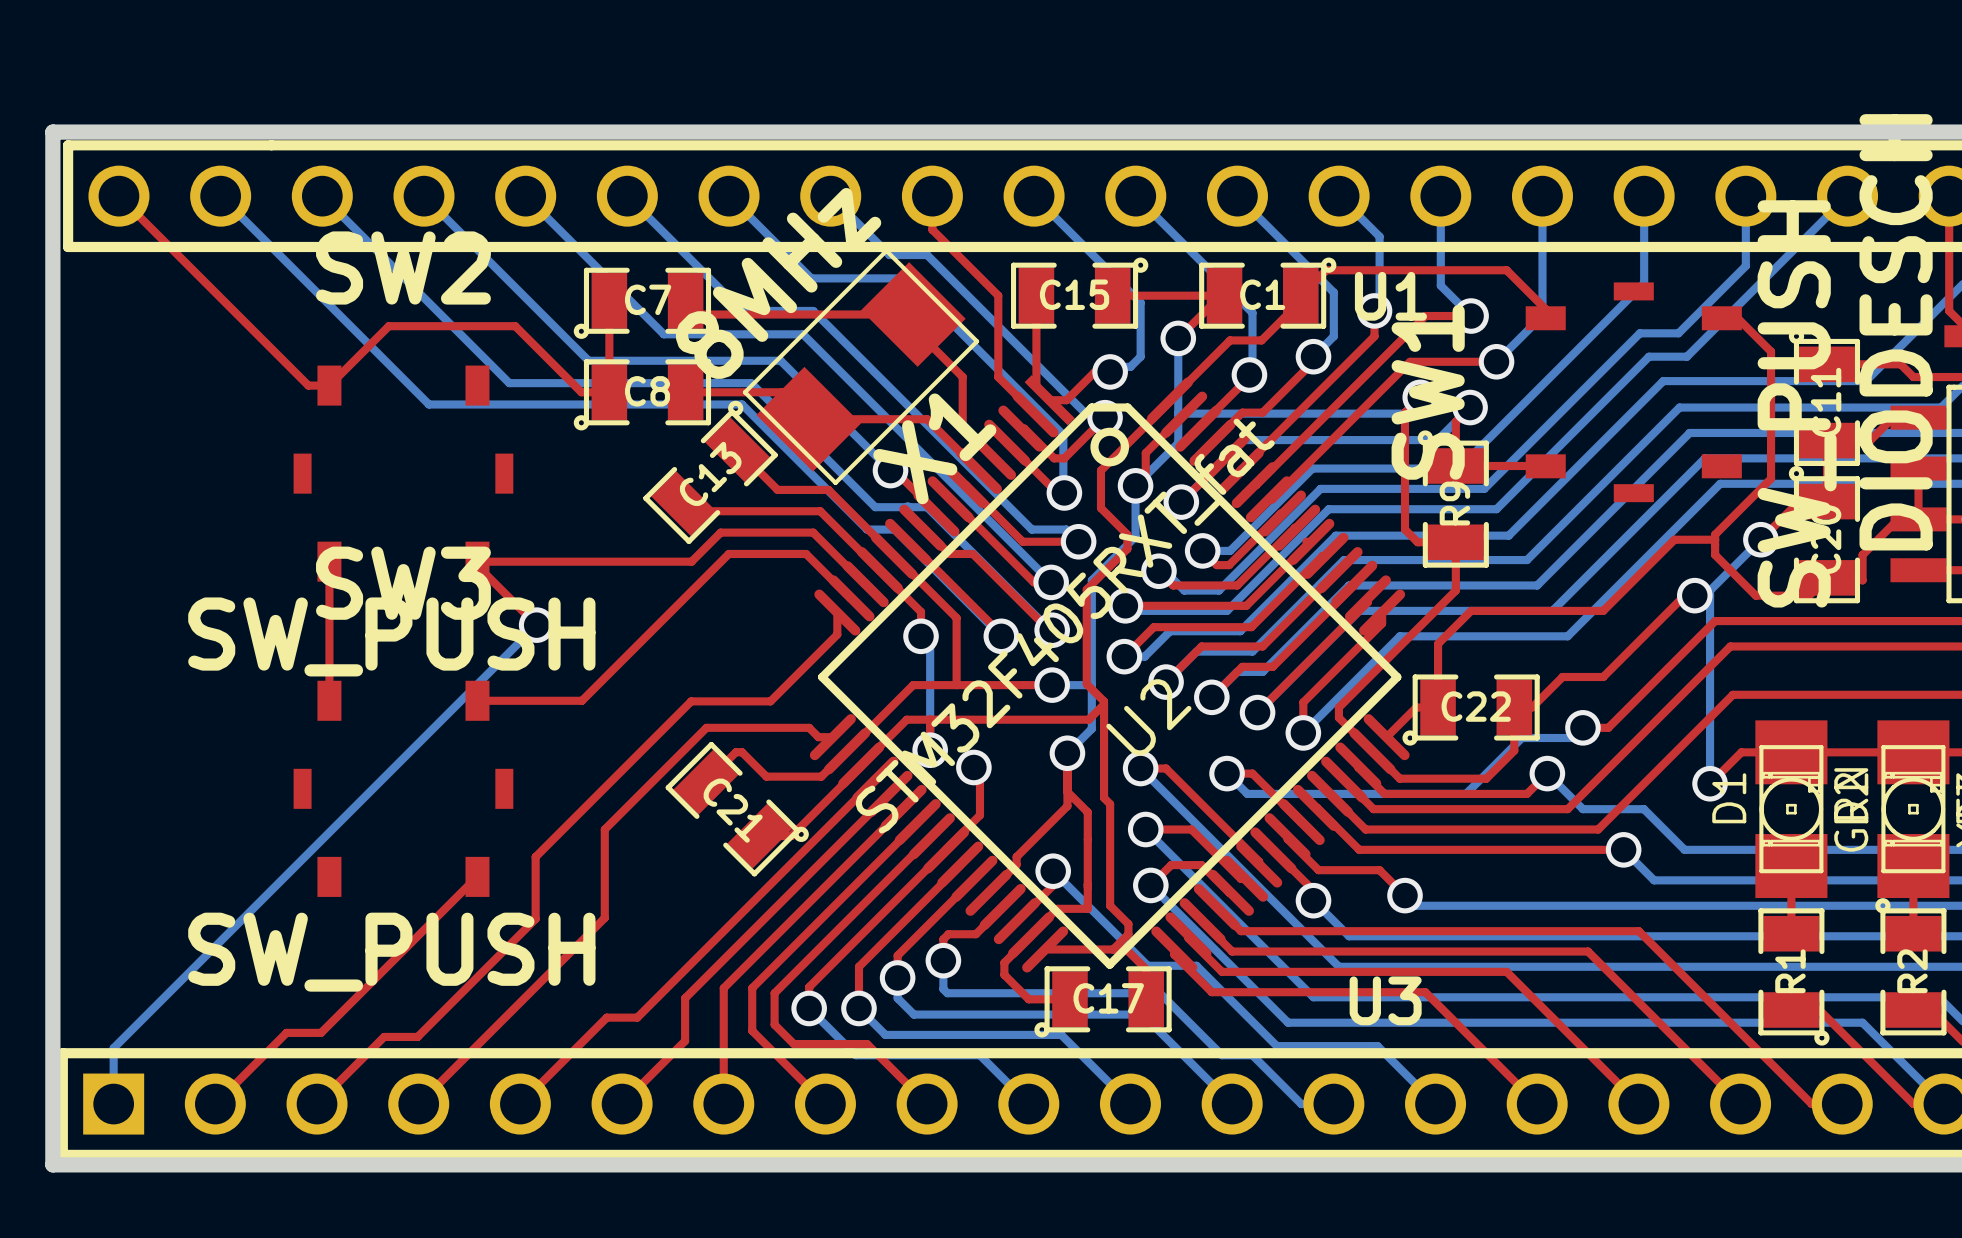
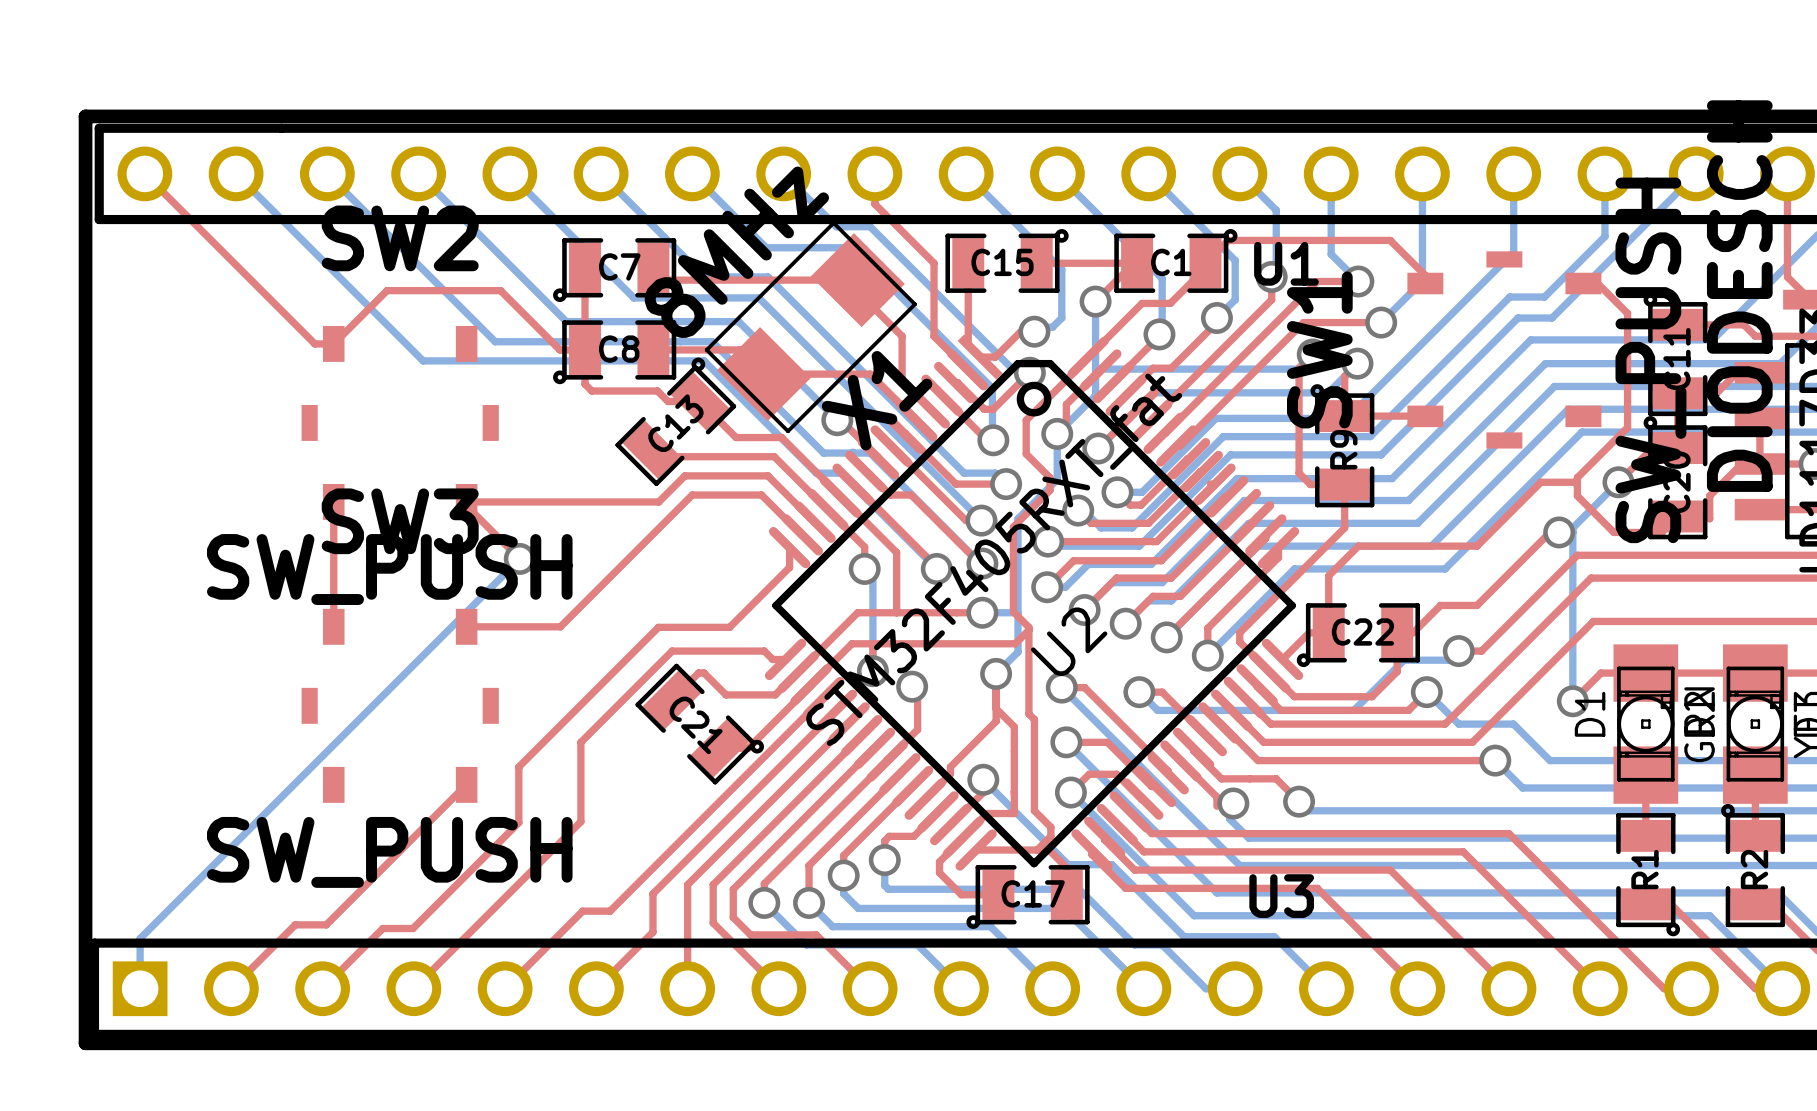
top track: none -> (584, 349) (584, 384) (591, 391) (657, 391) (668, 401) (699, 401)
via position: (1313, 900) -> (1233, 803)

